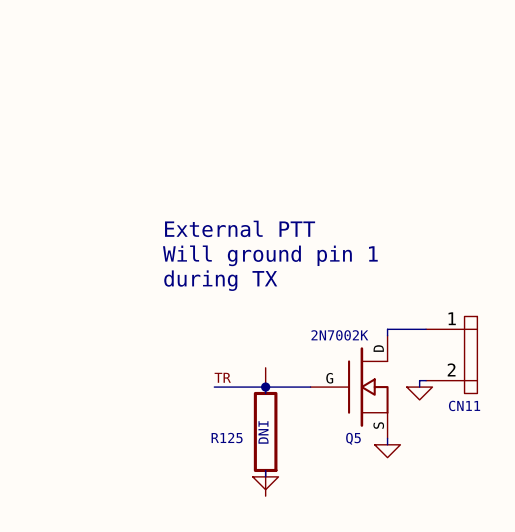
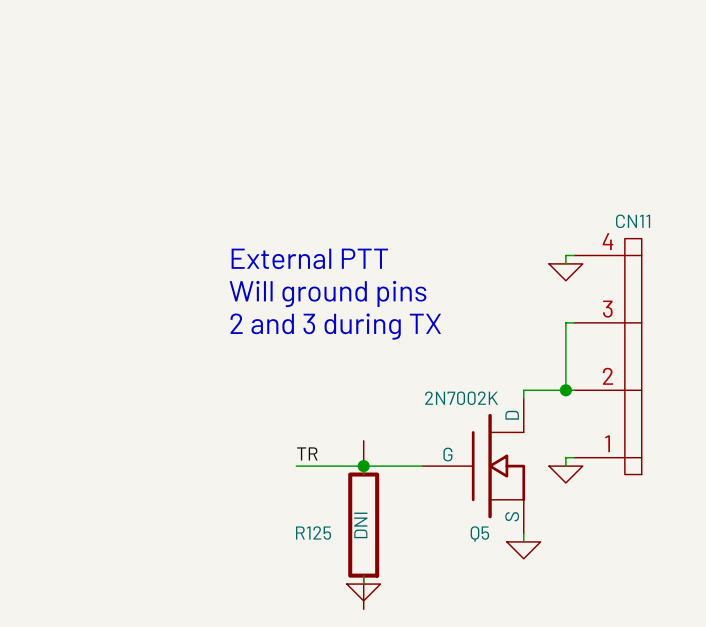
wire: none -> (574, 255) (565, 255) (565, 263)
power symbol: none -> (565, 272)
text: Will ground pin 1 (270, 255) -> Will ground pins (328, 294)
wire: none -> (574, 322) (565, 322) (565, 390)
text: during TX (220, 280) -> 2 and 3 during TX (335, 326)
CN11 symbol: [426, 316, 478, 394] -> [574, 238, 642, 475]
junction: none -> (565, 390)
CN11 name position: CN11 (464, 405) -> CN11 (633, 221)

